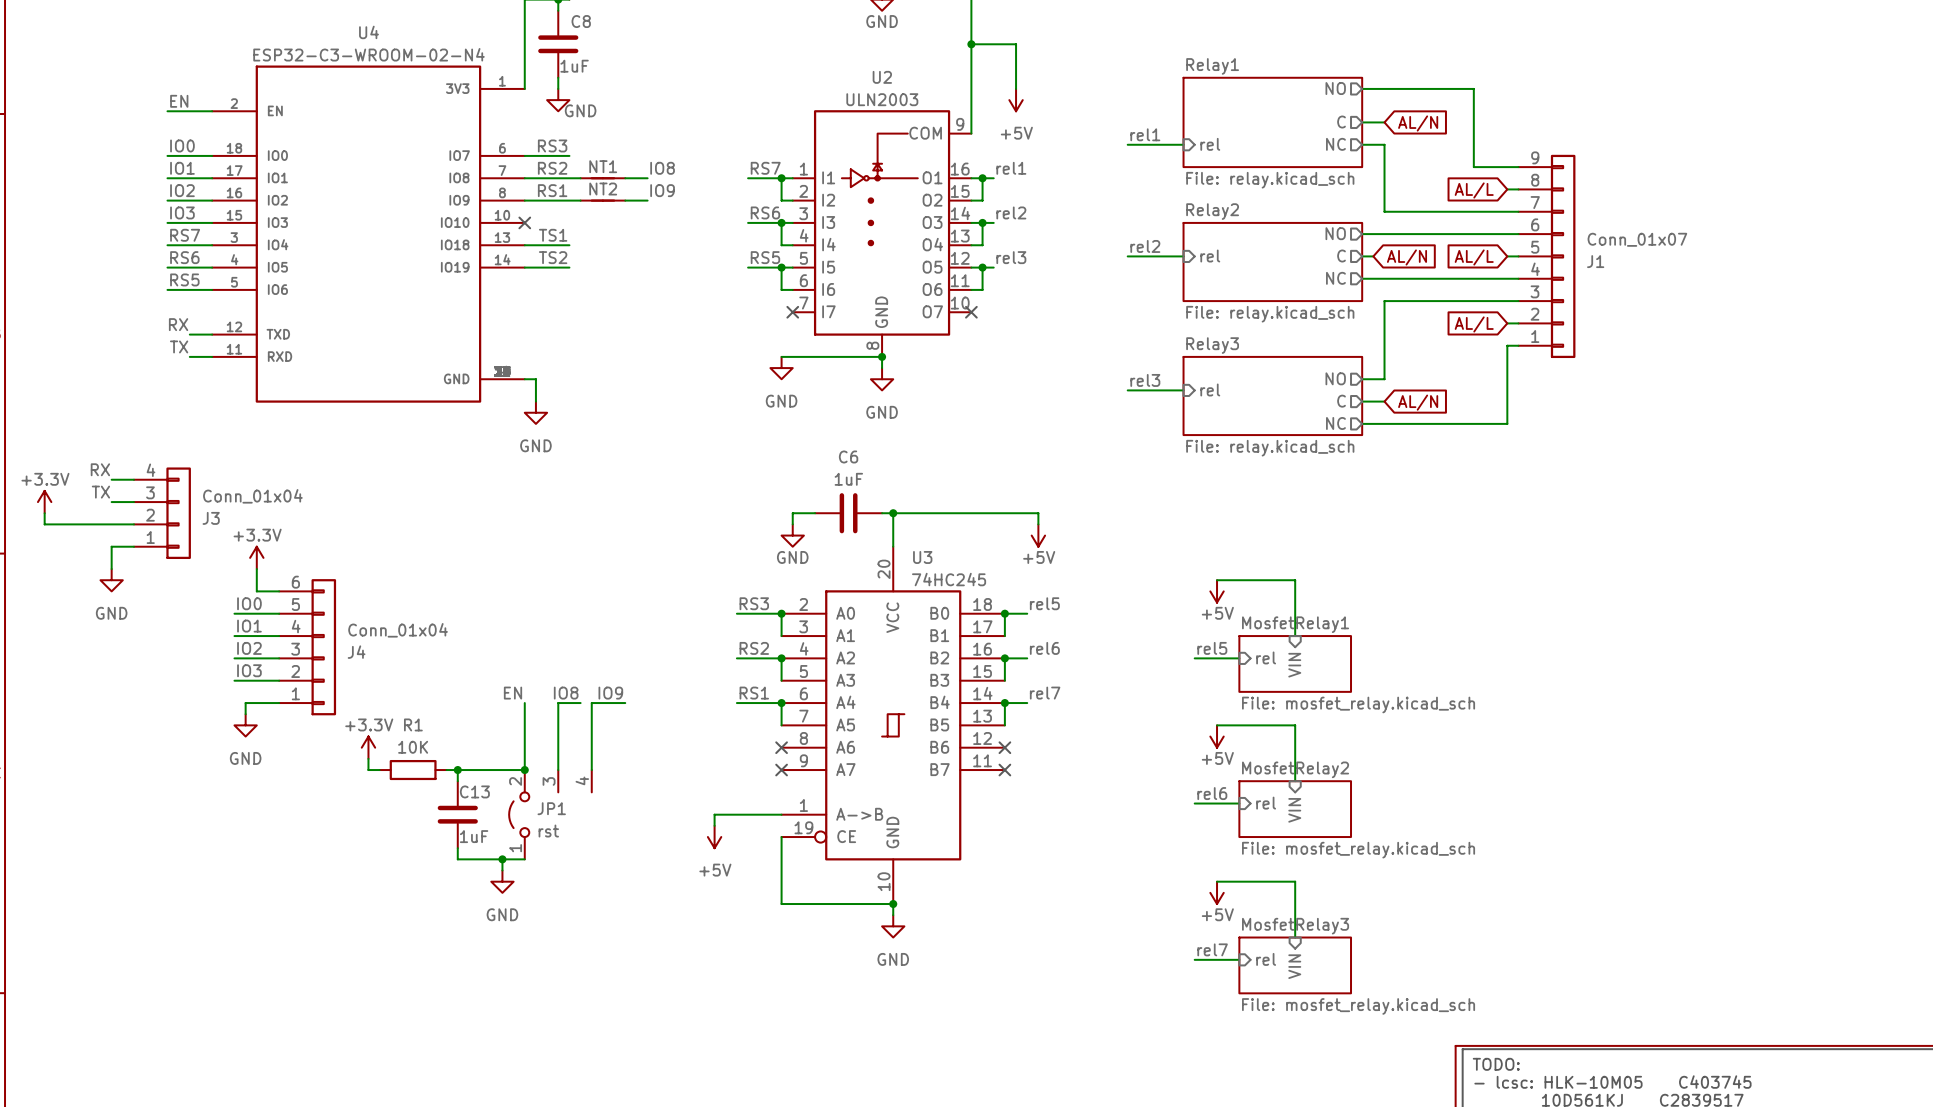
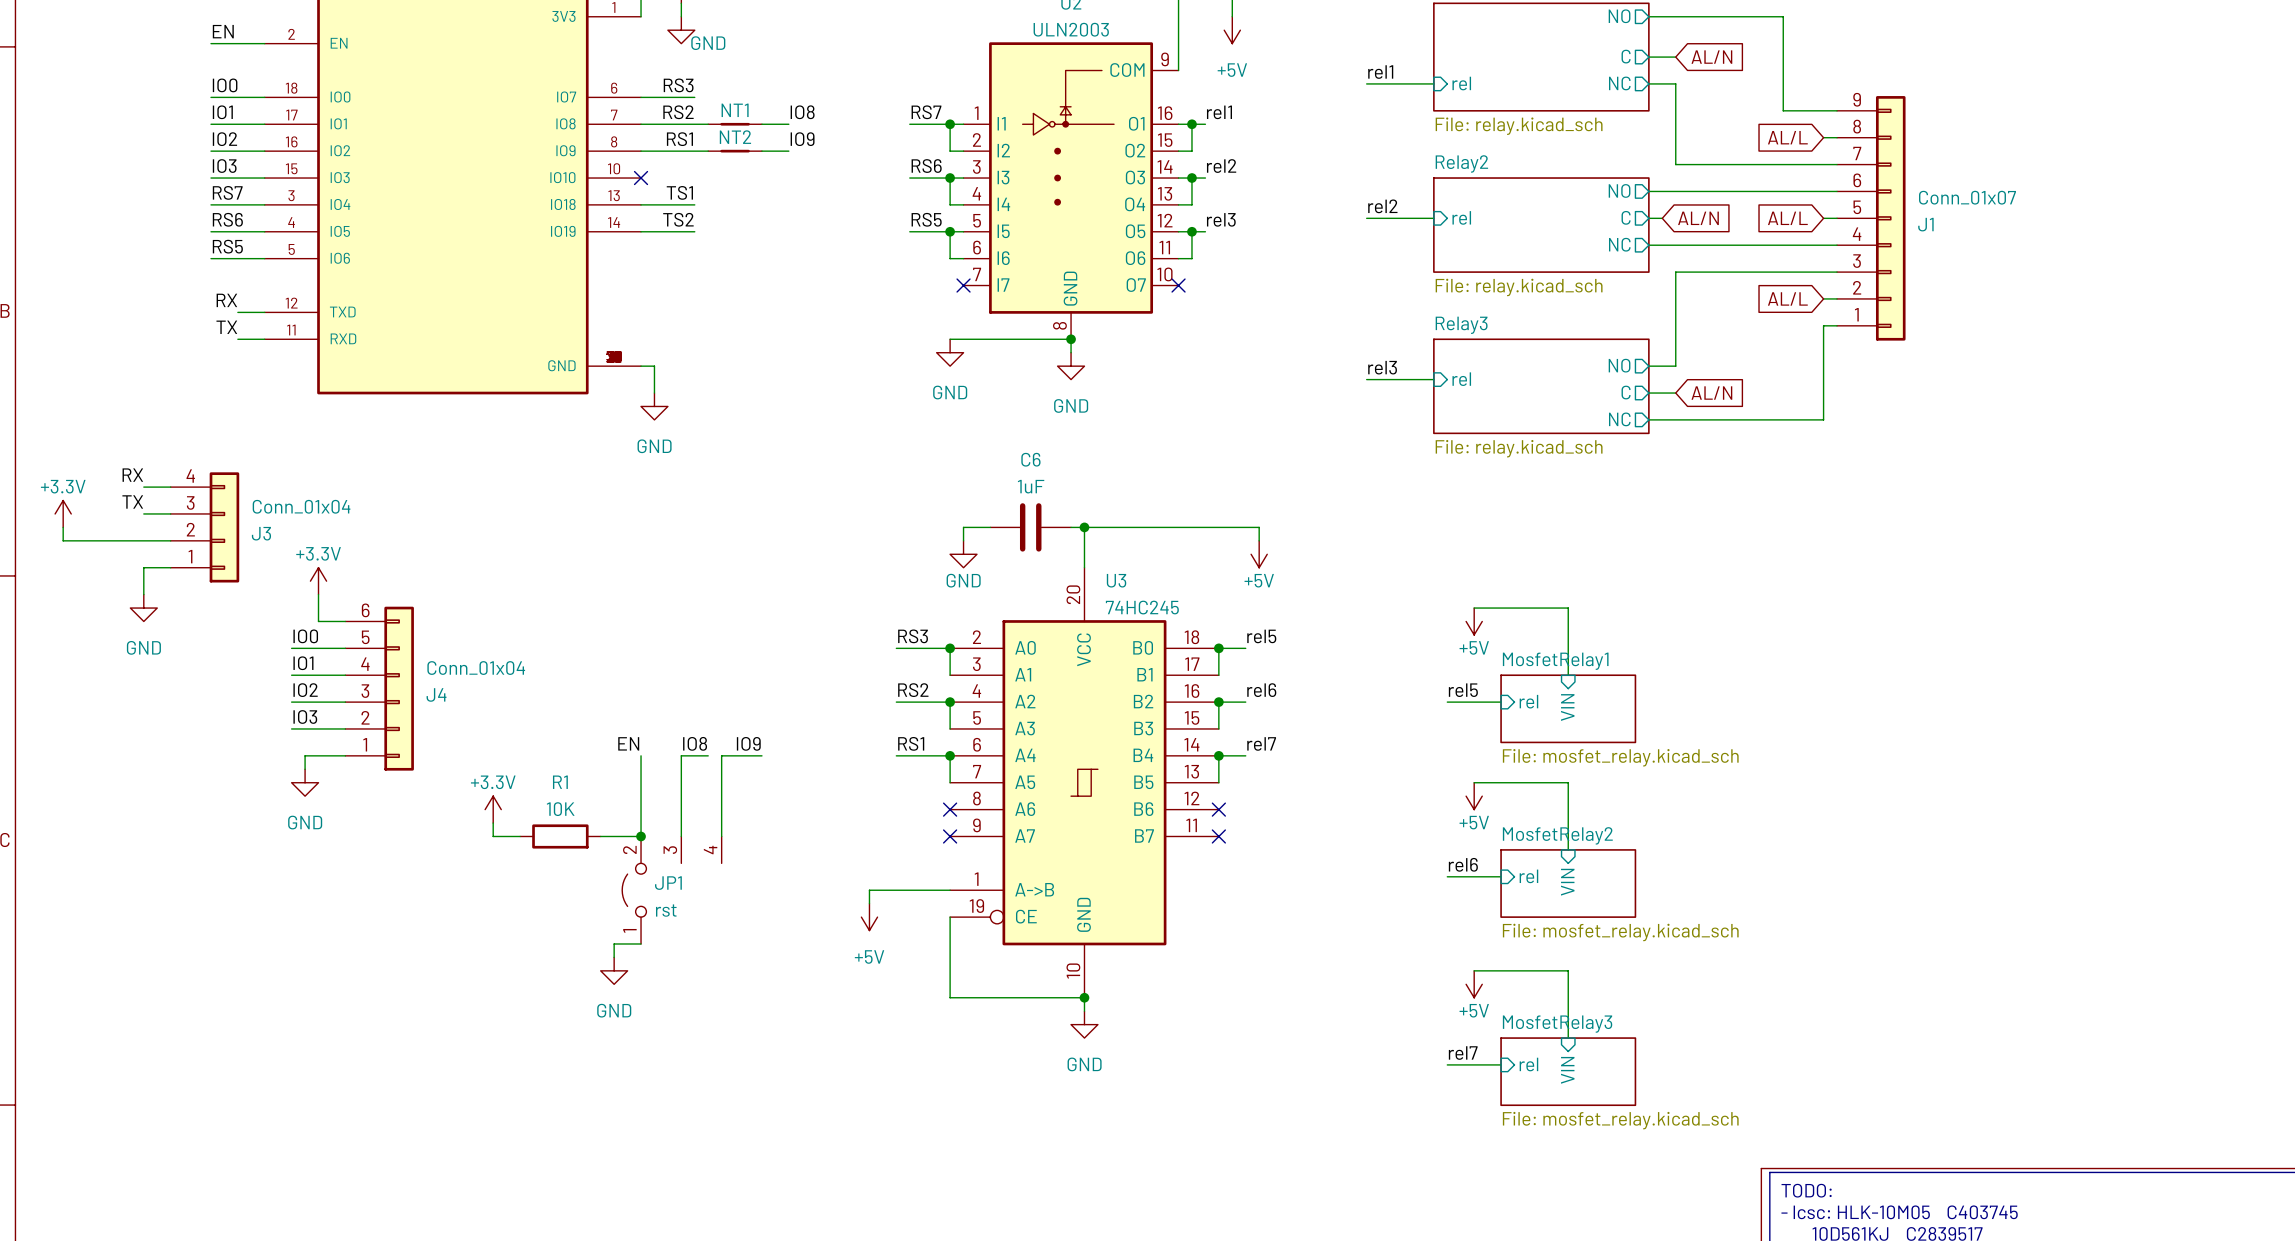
power symbol position: +3.3V (368, 747) -> +3.3V (493, 809)
wire: (368, 758) (368, 770) (379, 770) -> none
wire: none -> (493, 823) (493, 836) (520, 836)
R1 position: (413, 770) -> (560, 836)
wire: (446, 770) (491, 770) -> none
wire: (457, 770) (457, 781) -> none
junction: (457, 770) -> none
C13: 1uF (457, 814) -> none
wire: (457, 848) (457, 859) (502, 859) -> none
junction: (502, 859) -> none

